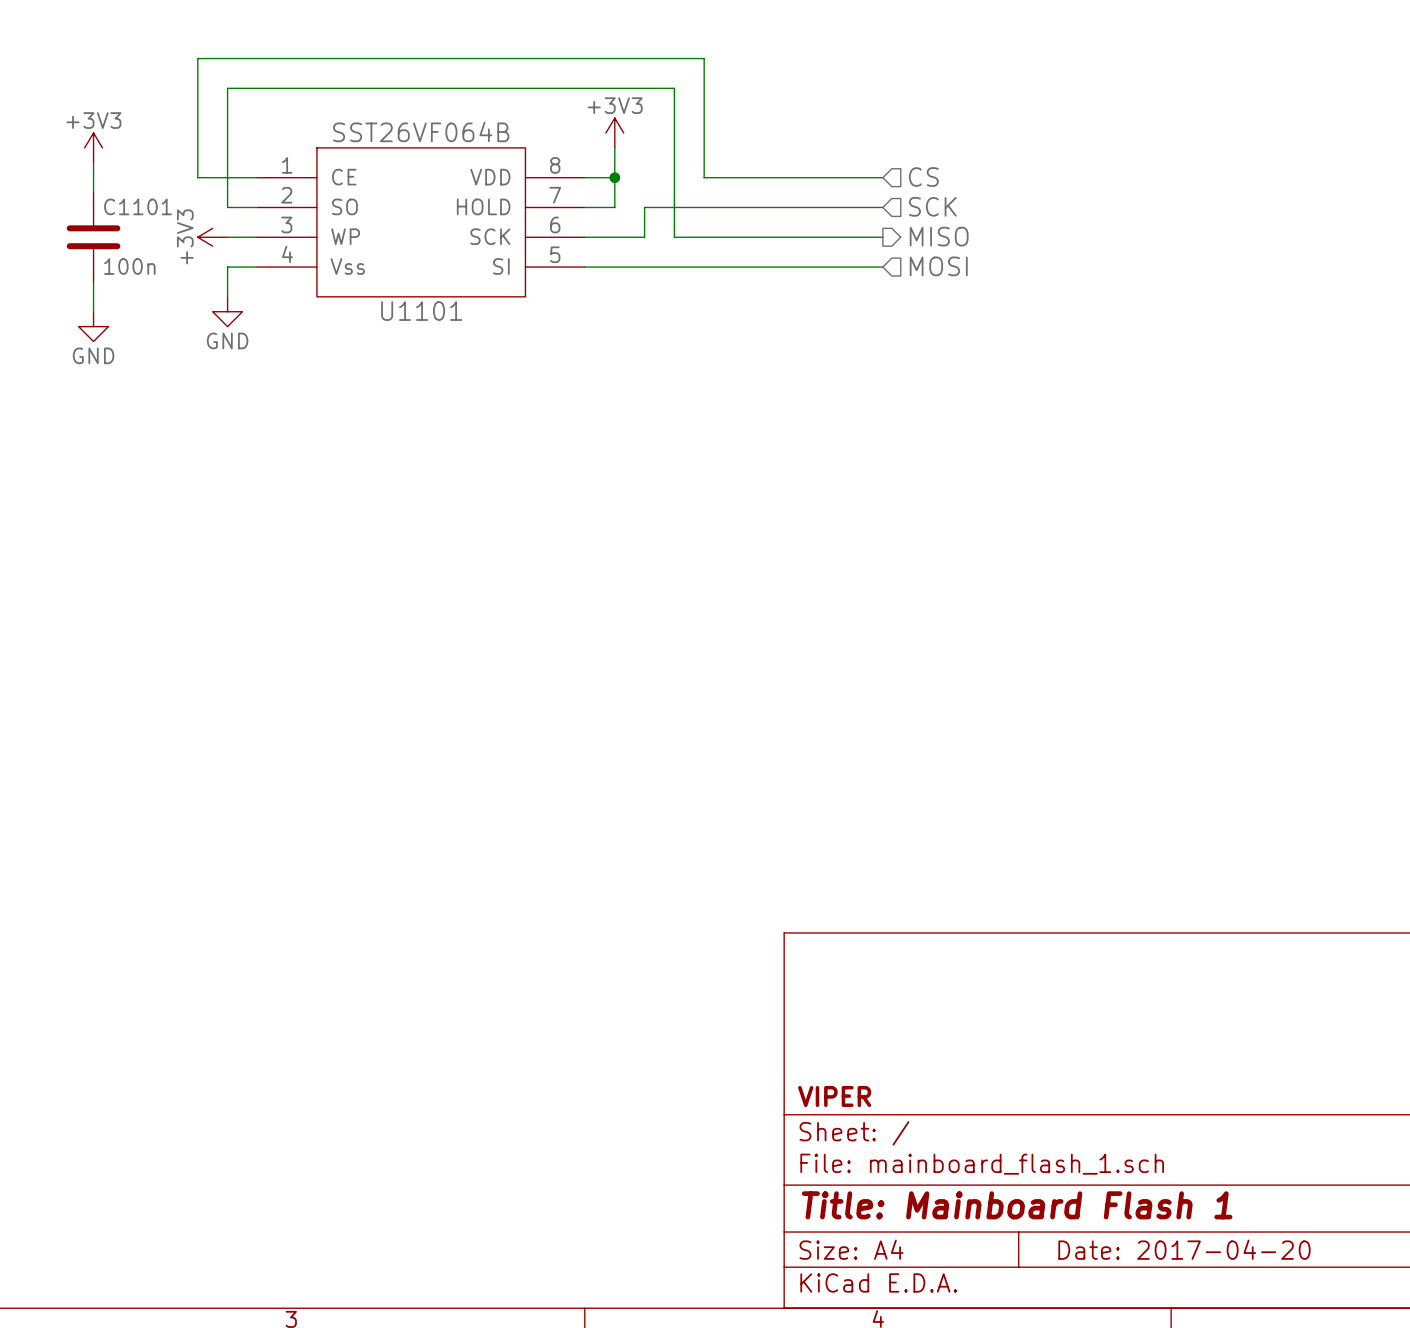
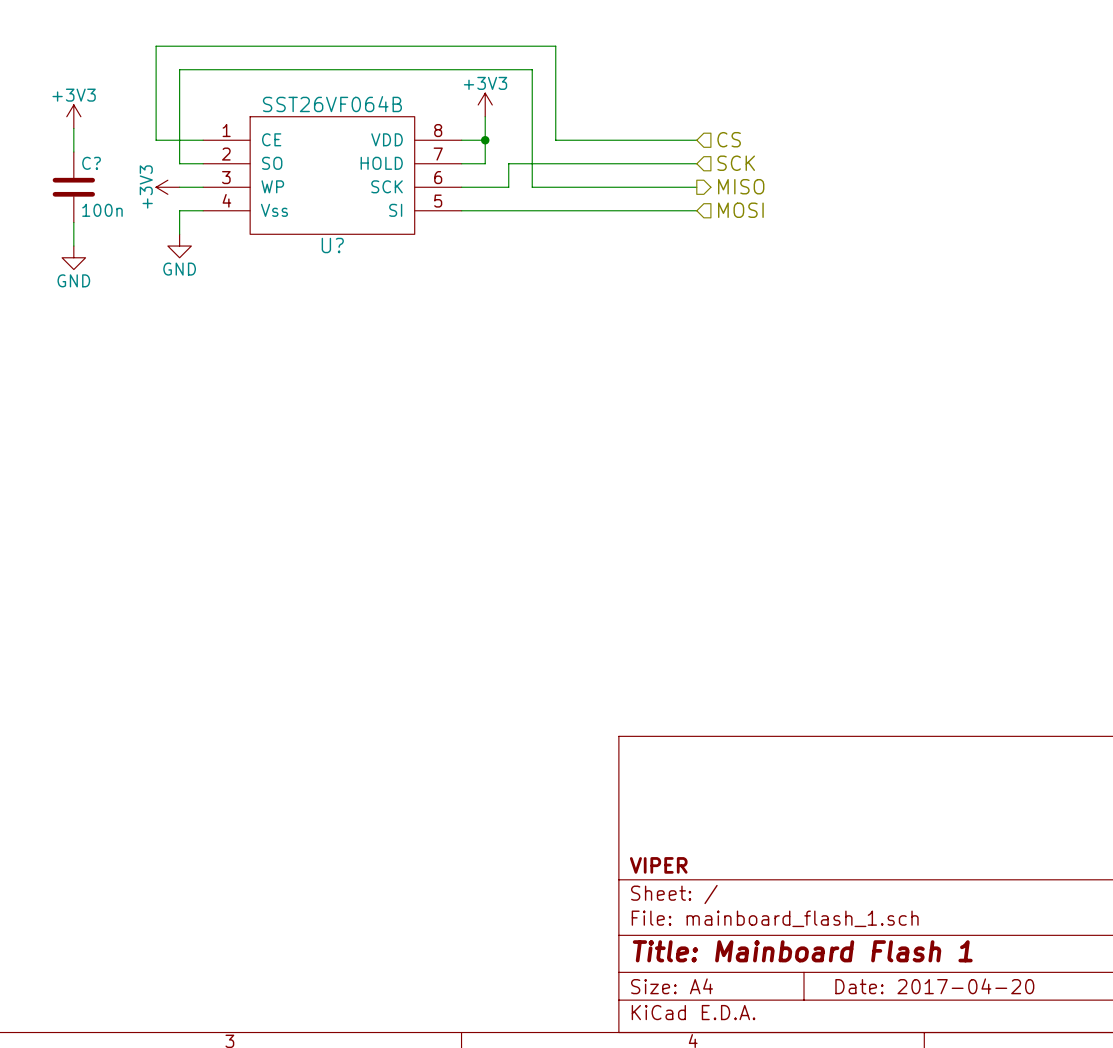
C1101 name: C1101 (137, 206) -> C? (91, 163)
U1101 name: U1101 (421, 311) -> U? (332, 245)

